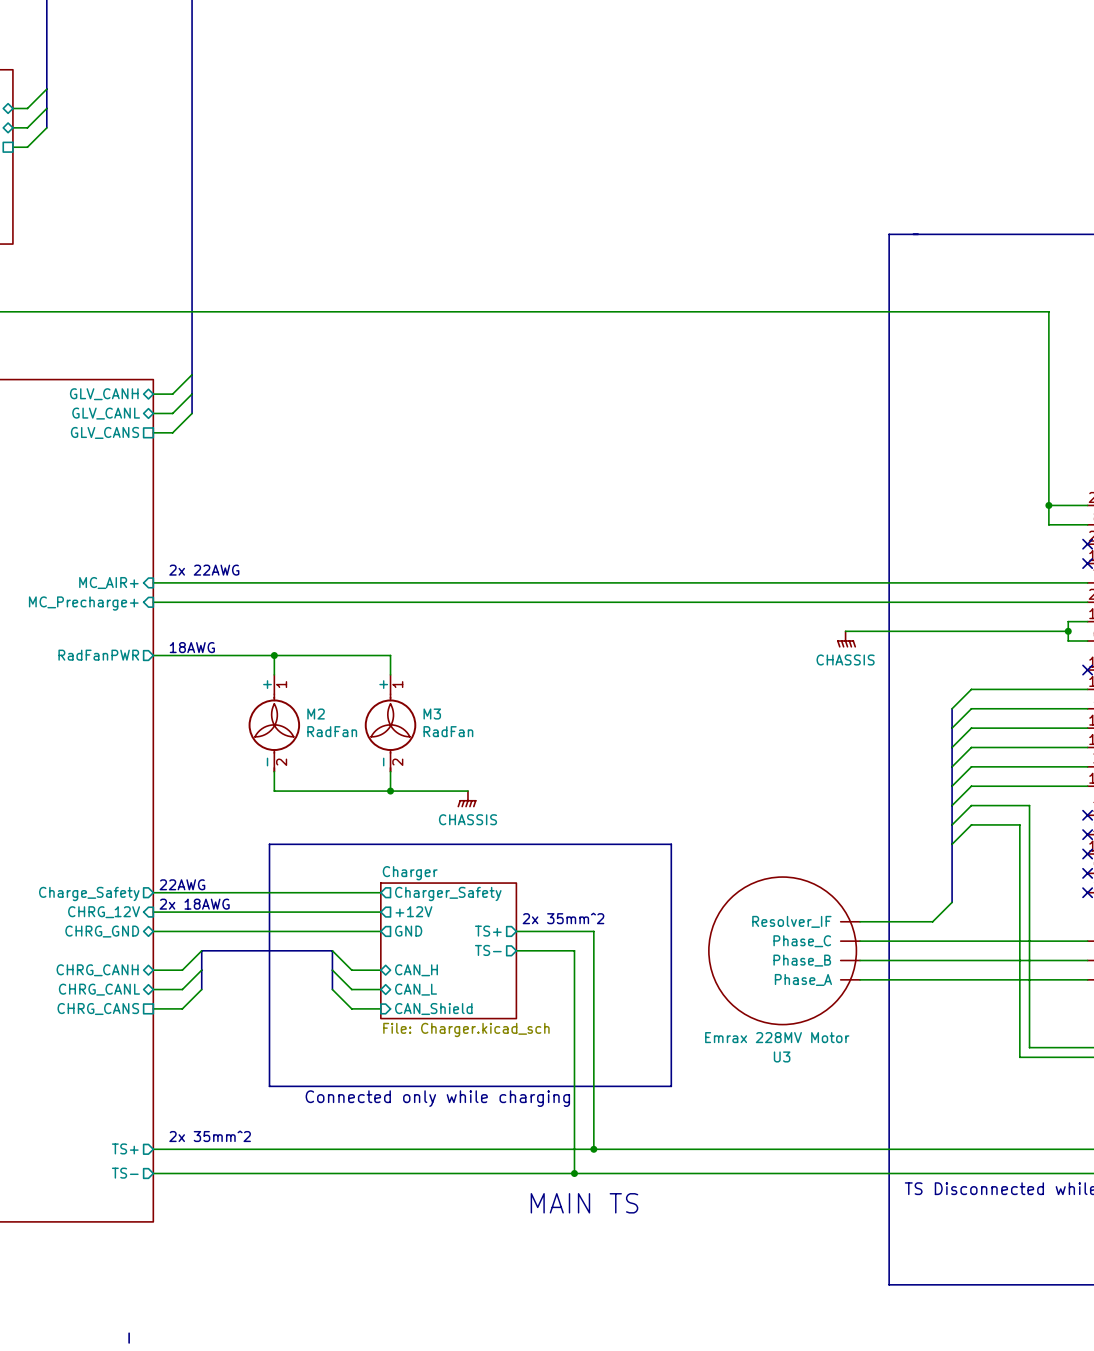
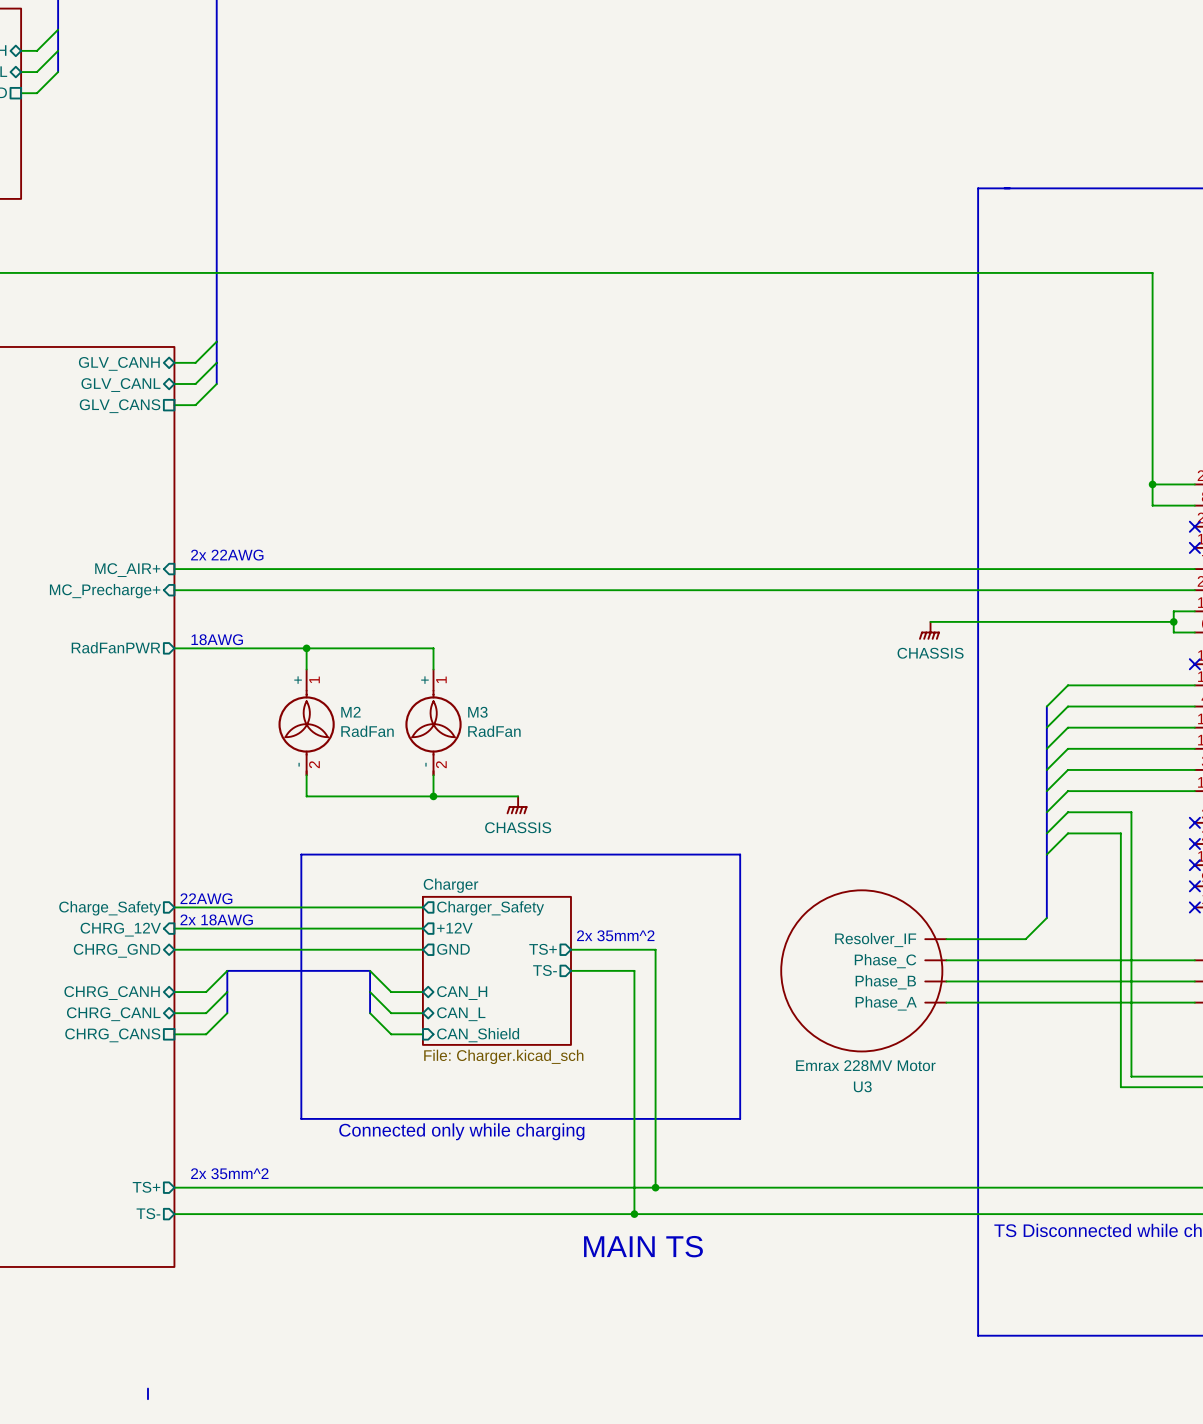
CHASSIS flip: as is (846, 639) -> left-right (929, 630)

